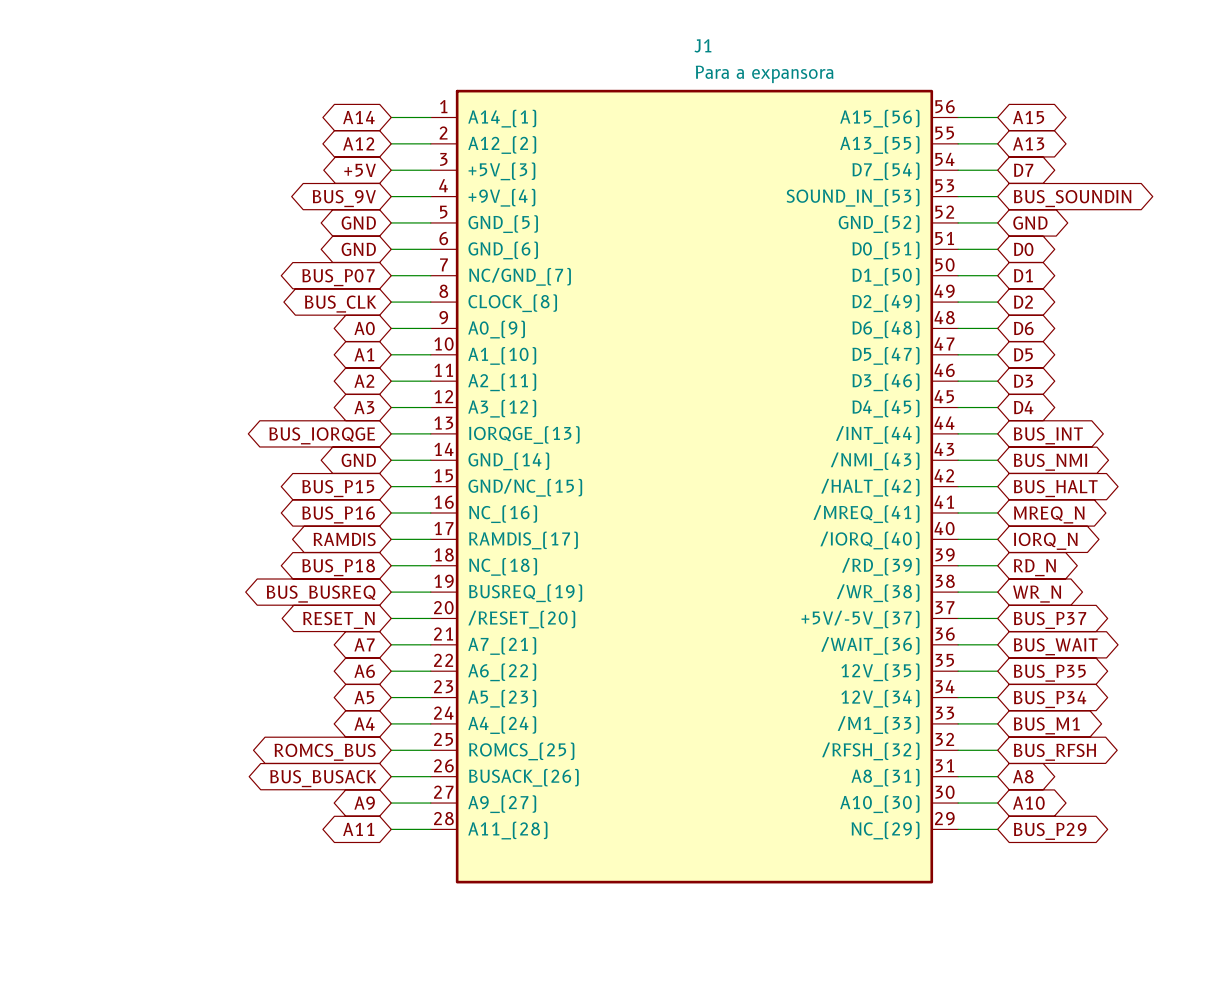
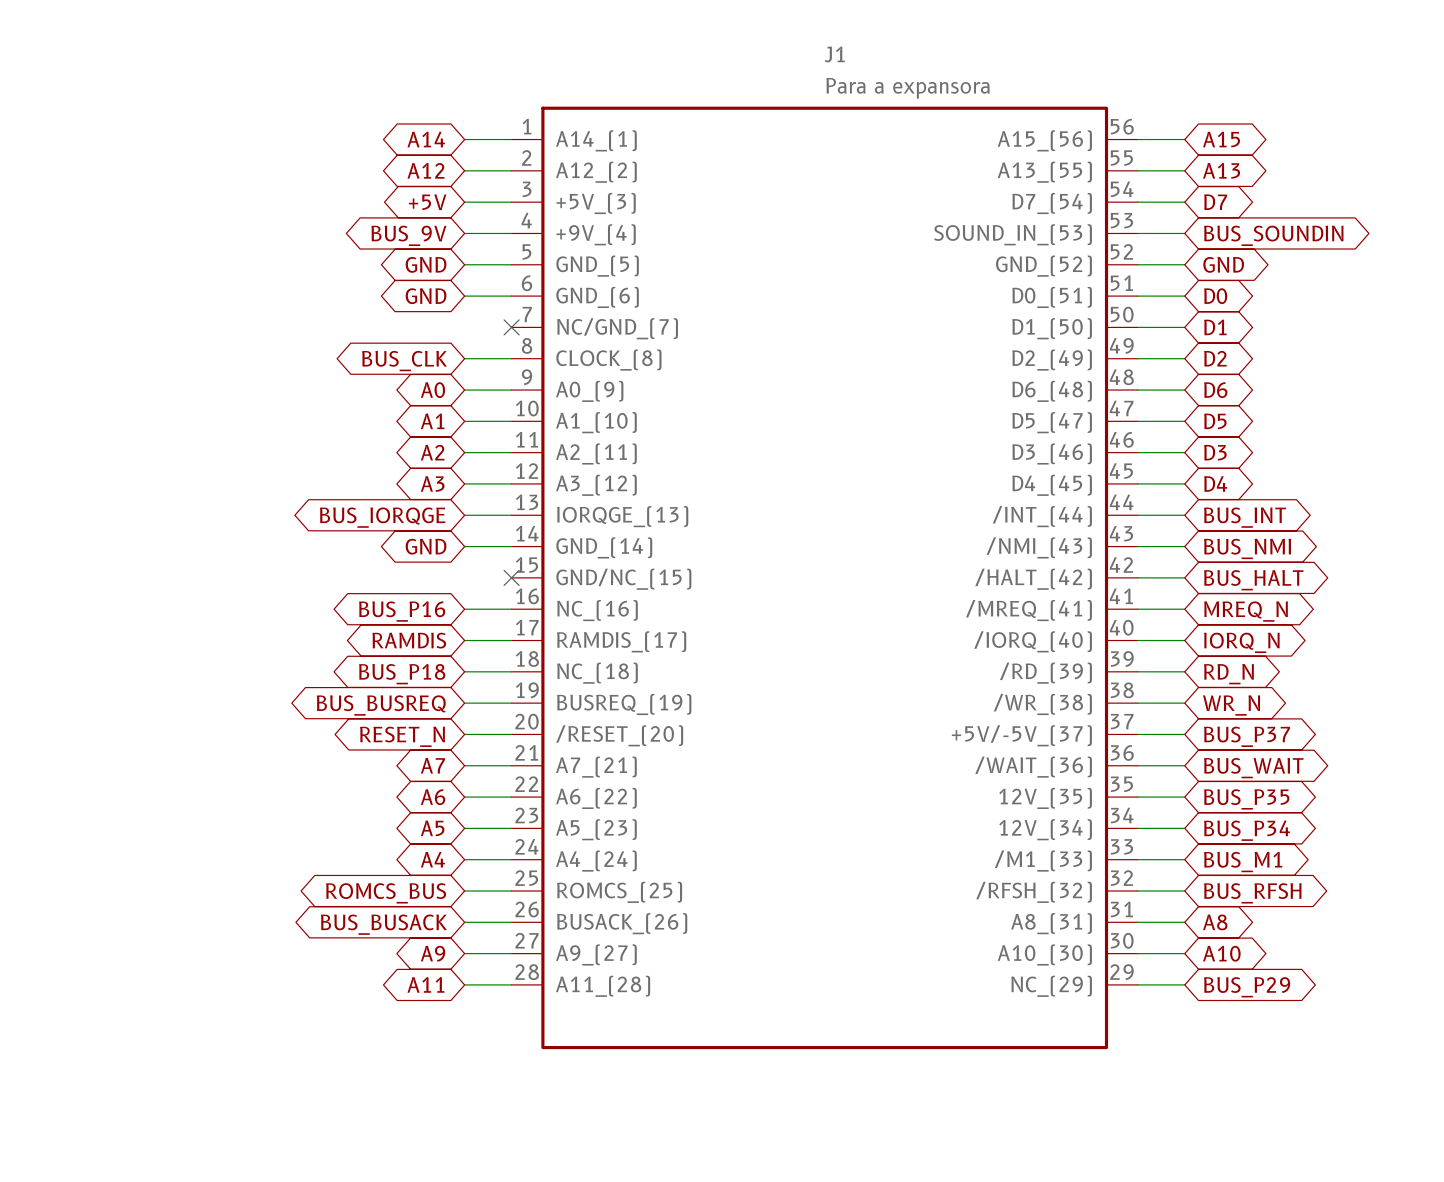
wire: (391, 275) (430, 275) -> none
no-connect mark: none -> (511, 327)
global label: BUS_P07 (338, 277) -> none
wire: (391, 486) (430, 486) -> none
no-connect mark: none -> (511, 577)
global label: BUS_P15 (338, 488) -> none

